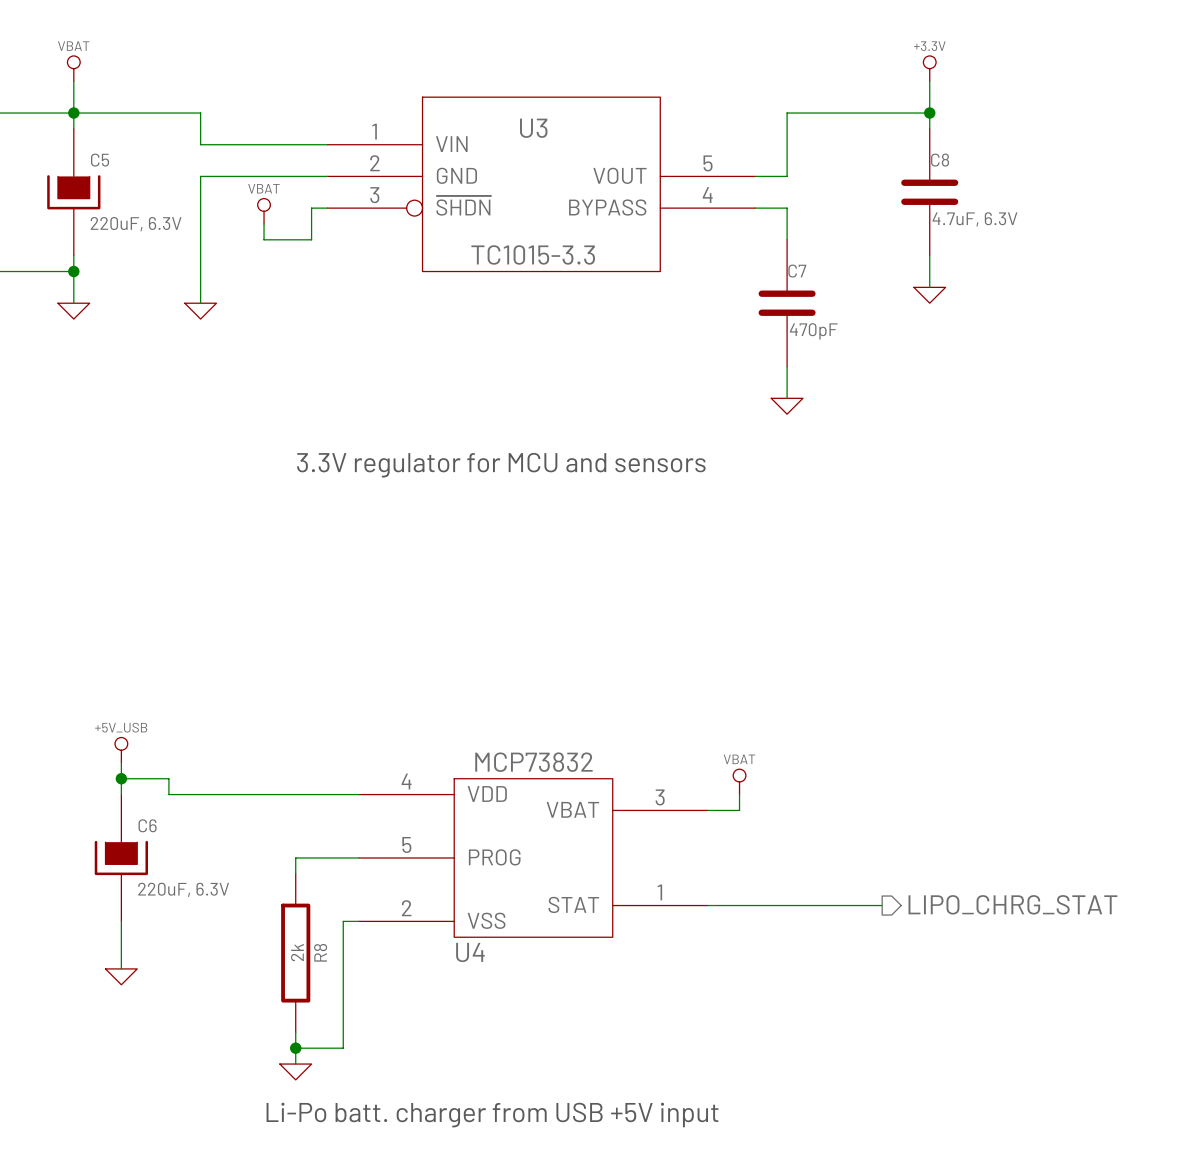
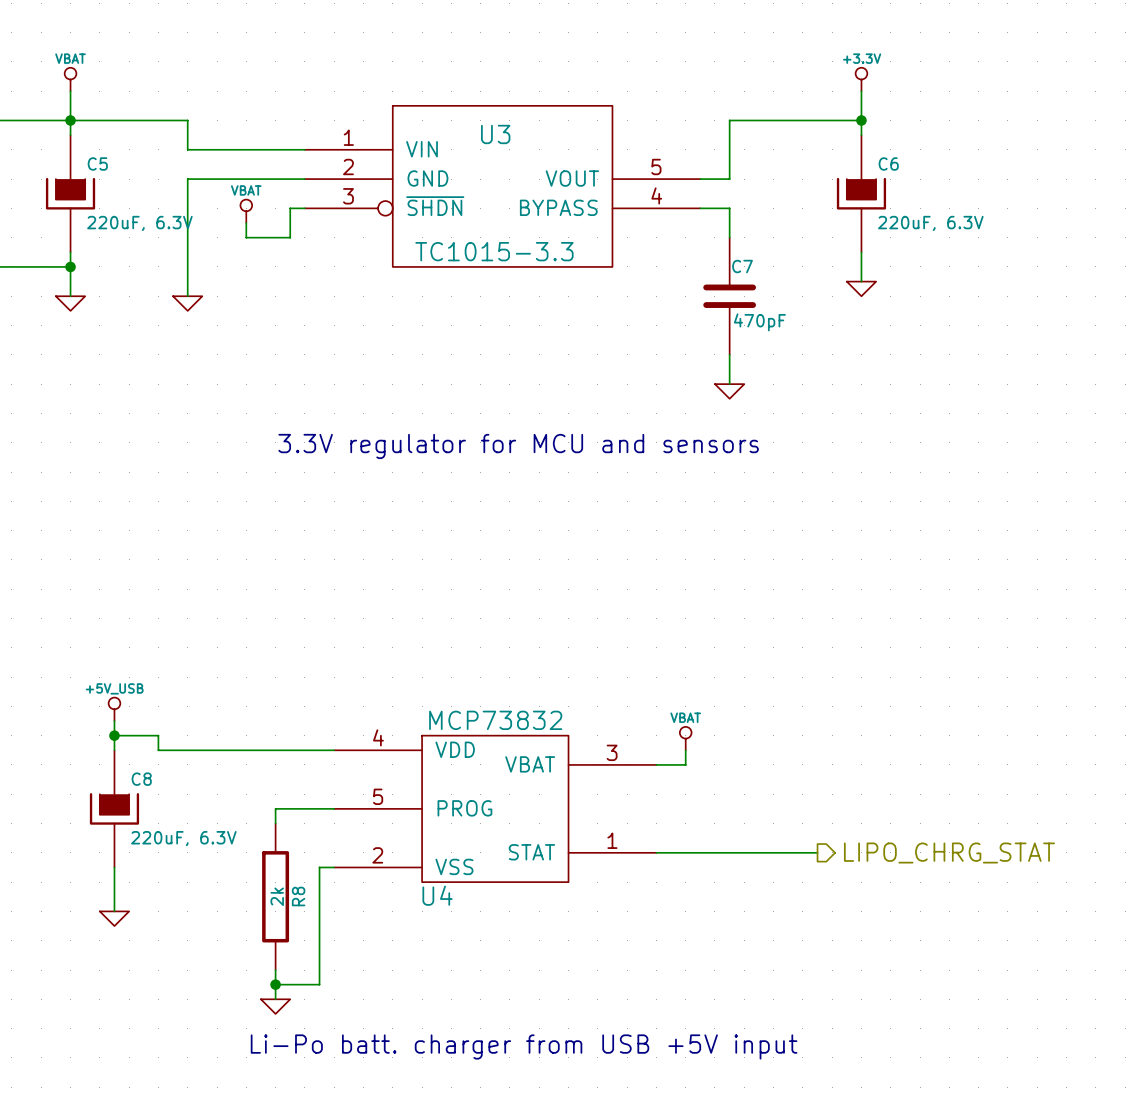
C8: 4.7uF, 6.3V (929, 192) -> none
C6: none -> 220uF, 6.3V (861, 193)
C6 name: C6 (147, 825) -> C8 (141, 779)

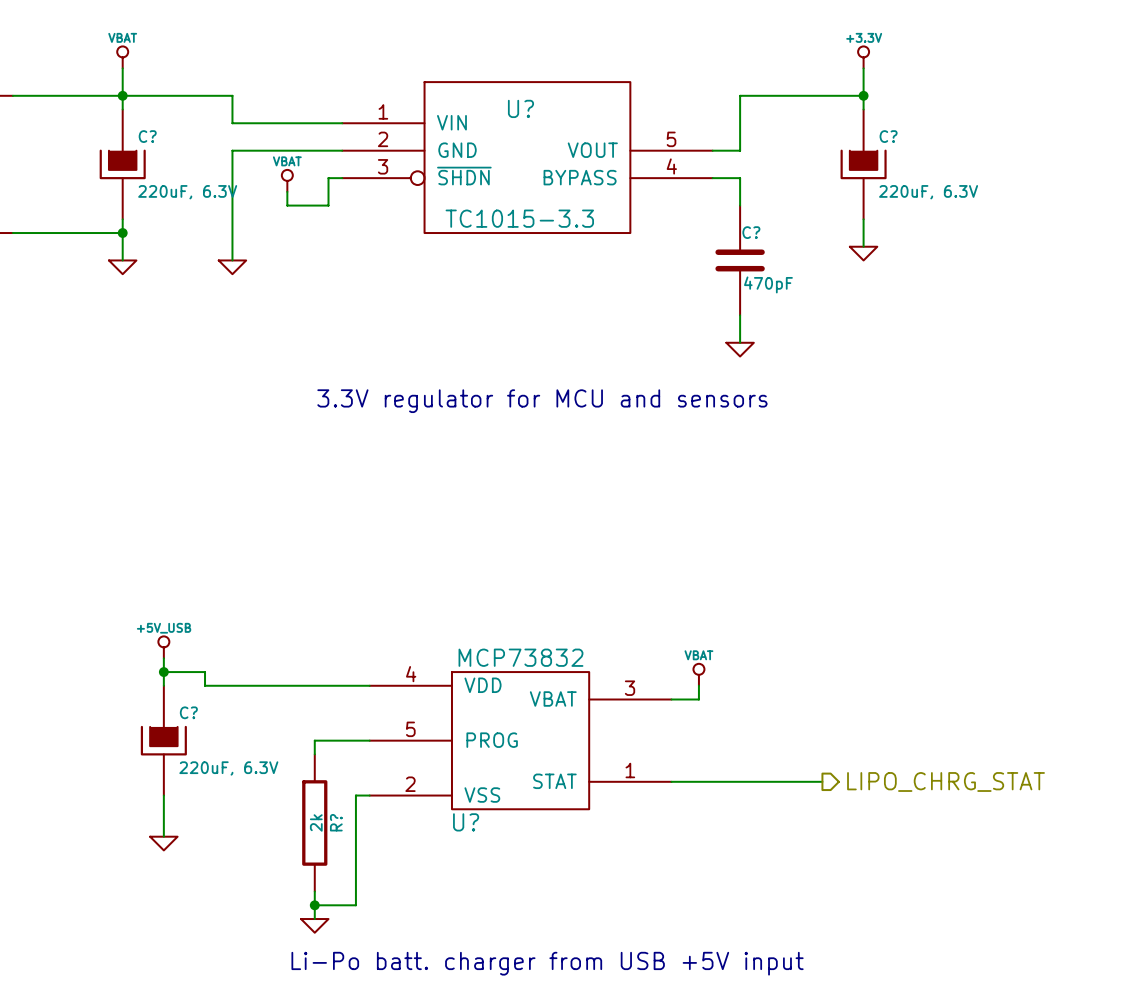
U3 name: U3 (495, 134) -> U? (520, 108)
C5 name: C5 (97, 163) -> C? (147, 136)
C6 name: C6 (888, 163) -> C? (888, 136)
C7 name: C7 (742, 266) -> C? (751, 232)
C8 name: C8 (141, 779) -> C? (188, 712)
U4 name: U4 (437, 895) -> U? (466, 822)
R8 name: R8 (298, 896) -> R? (336, 822)

